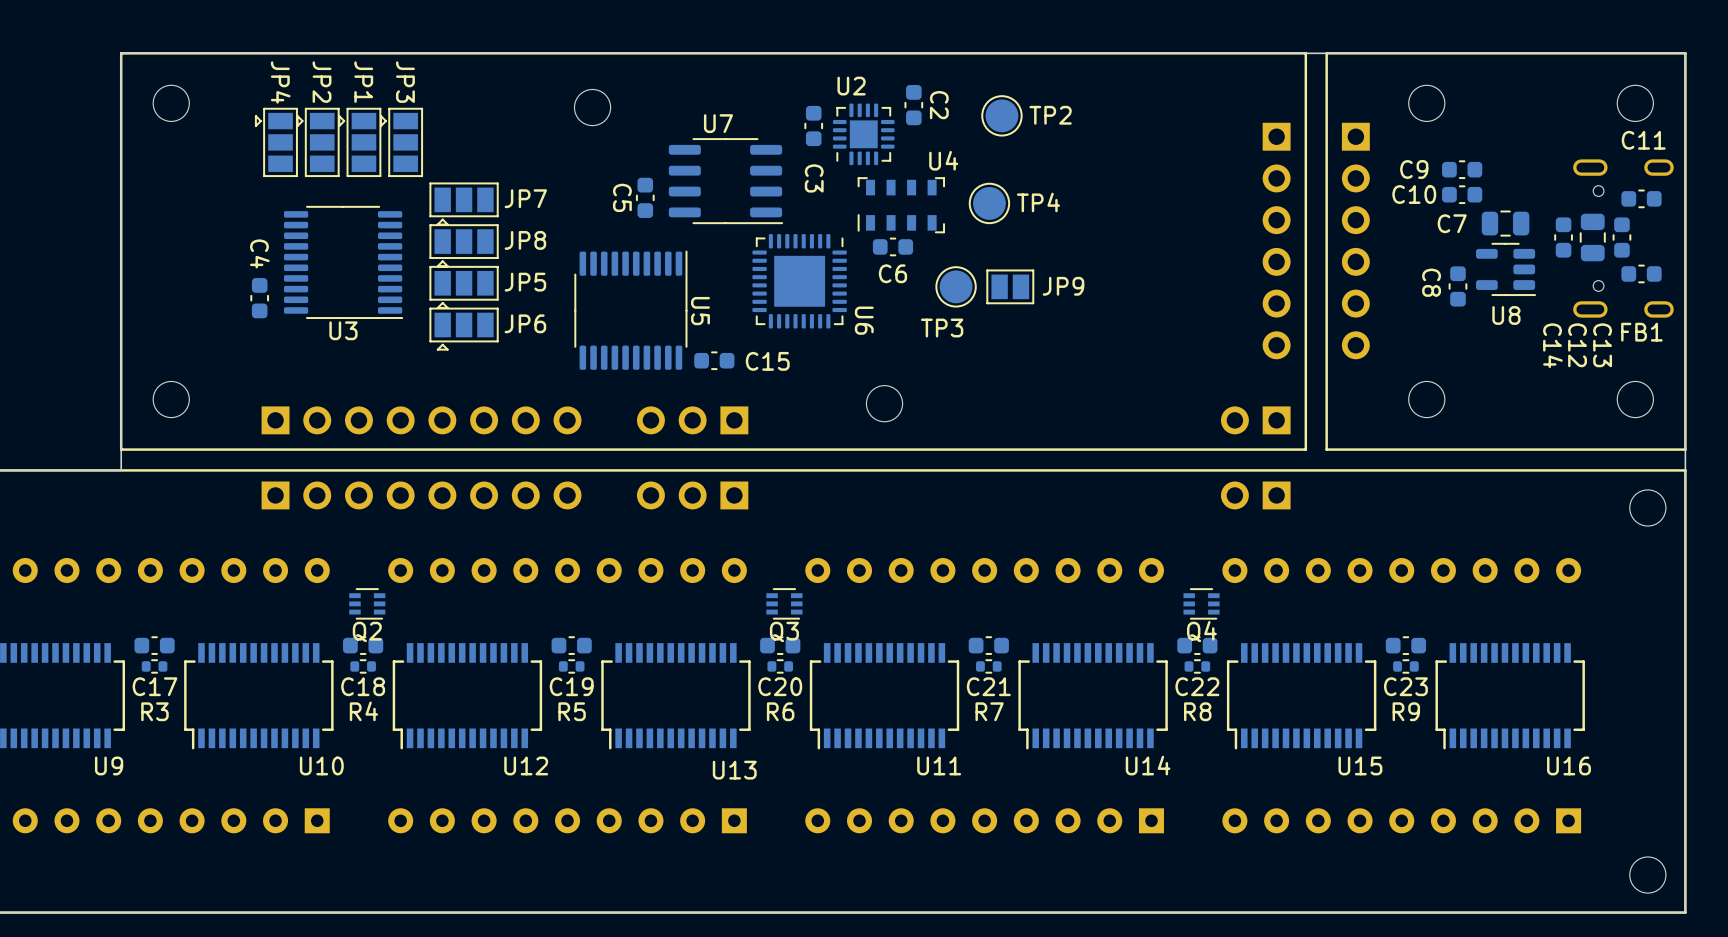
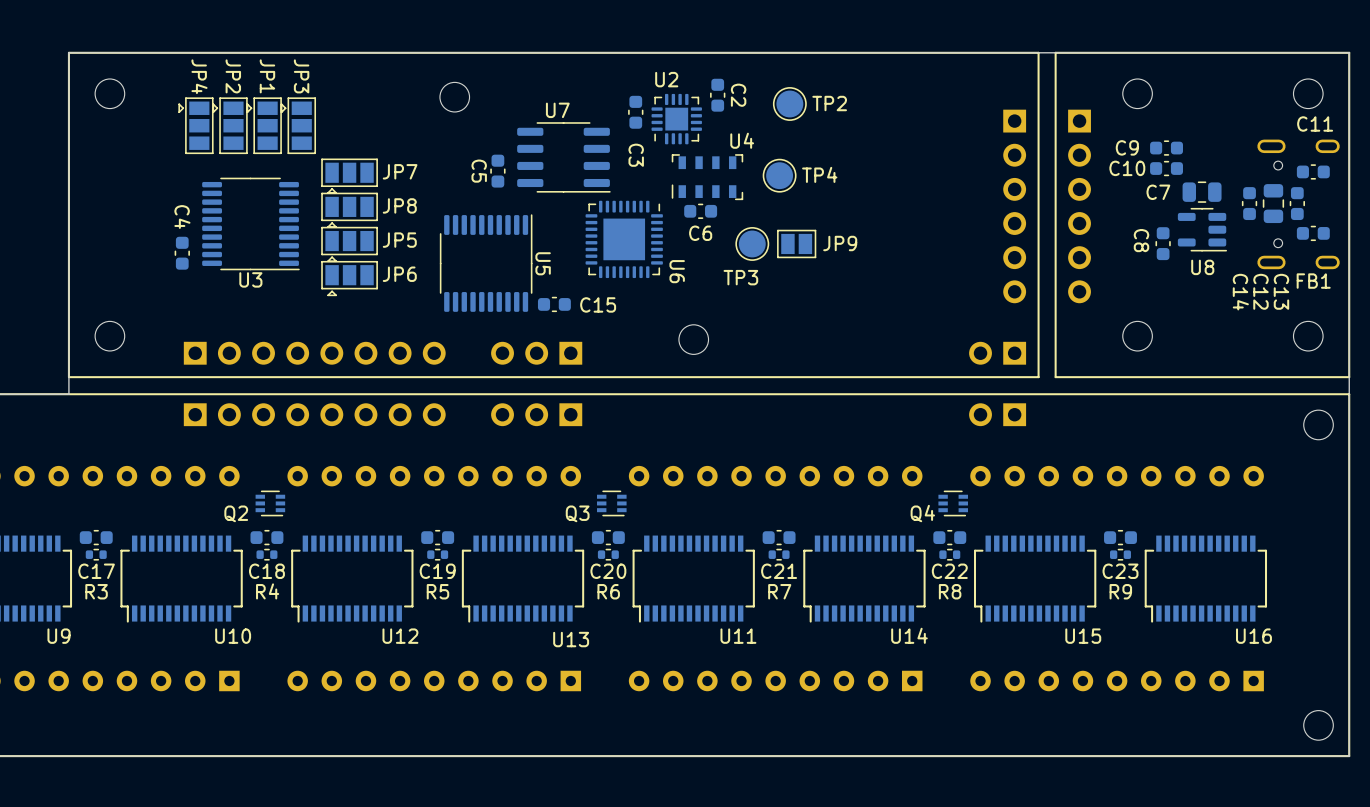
Q2 name position: Q2 (367, 631) -> Q2 (236, 513)
Q3 name position: Q3 (784, 631) -> Q3 (577, 513)
Q4 name position: Q4 (1201, 631) -> Q4 (922, 513)

